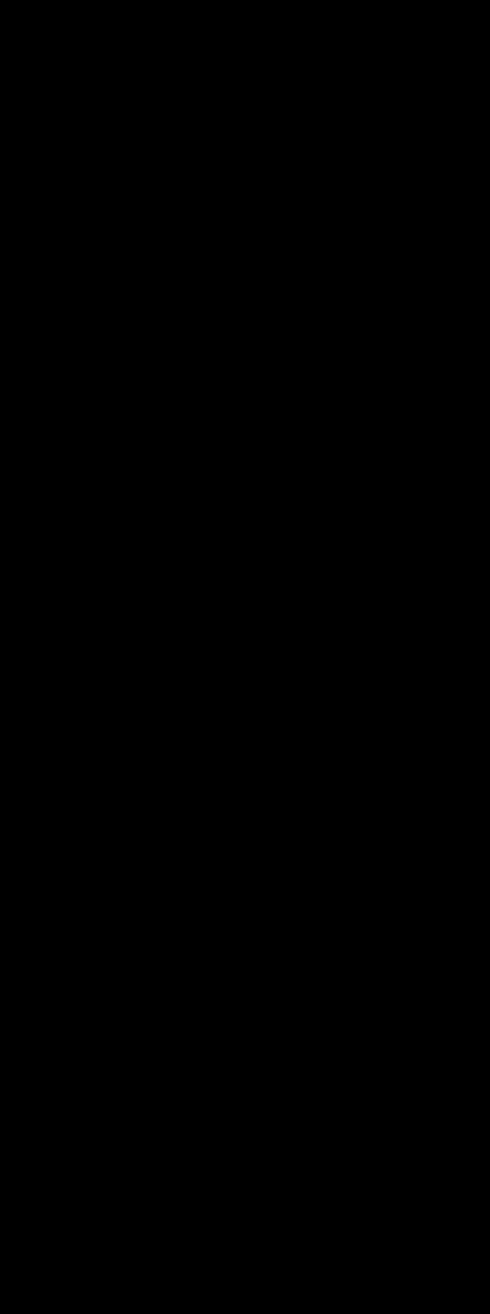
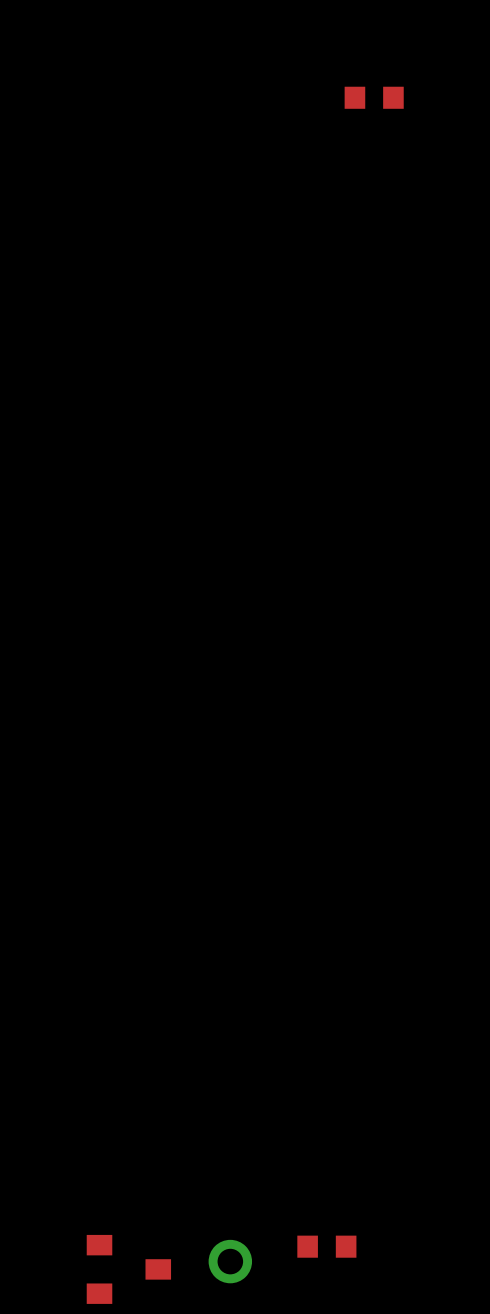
part: none -> (374, 97)
part: none -> (326, 1246)
part: none -> (230, 1261)
part: none -> (128, 1269)

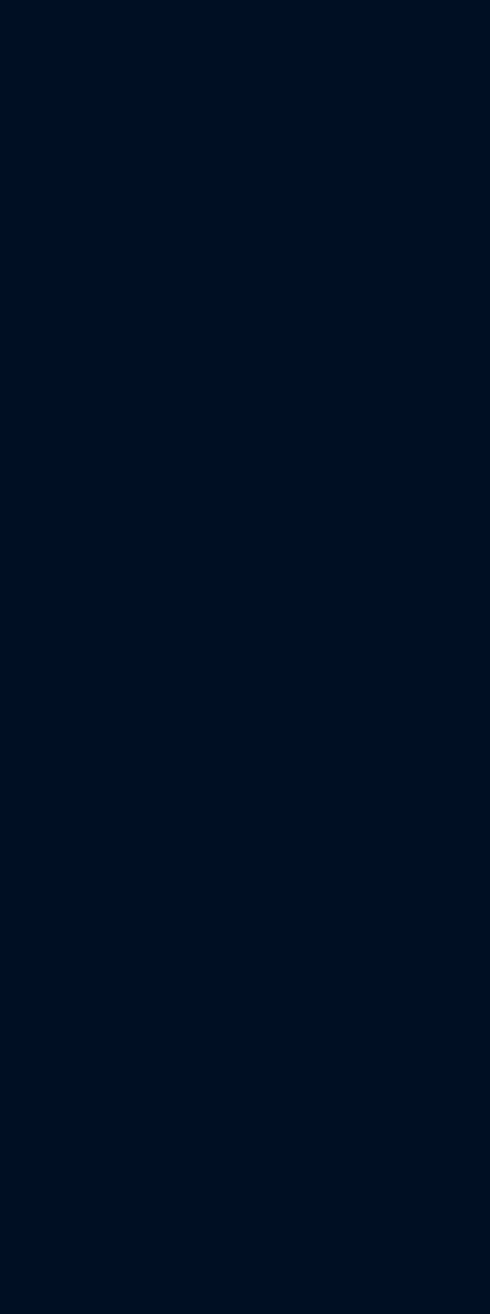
part: (374, 97) -> none
part: (326, 1246) -> none
part: (230, 1261) -> none
part: (128, 1269) -> none

